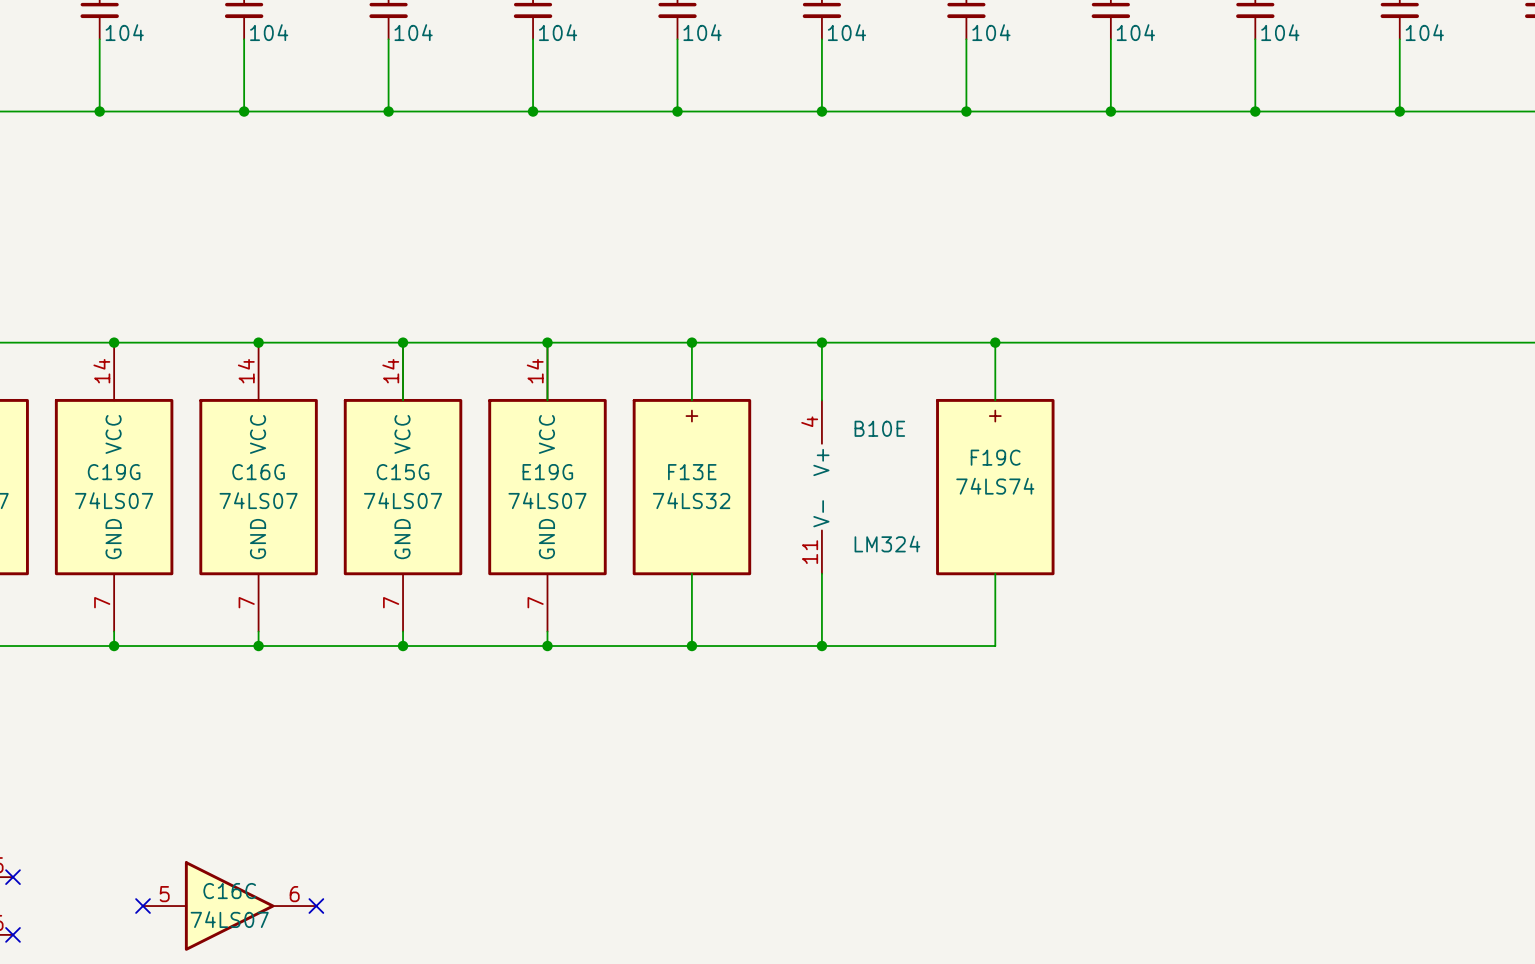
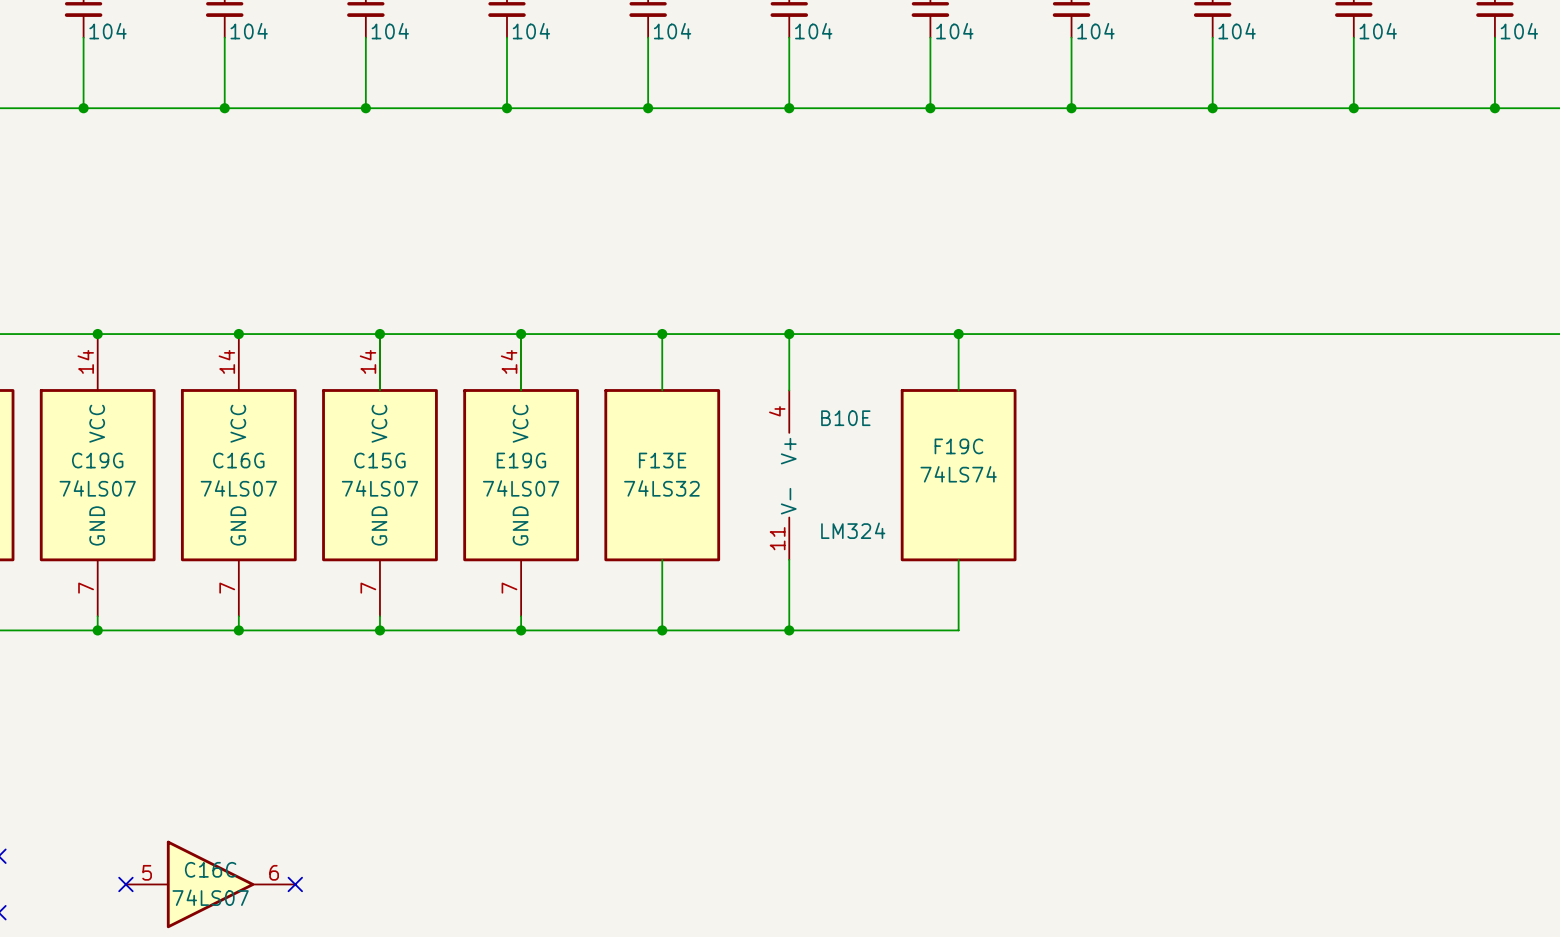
F13E text: + (691, 416) -> none
F19C text: + (995, 416) -> none

